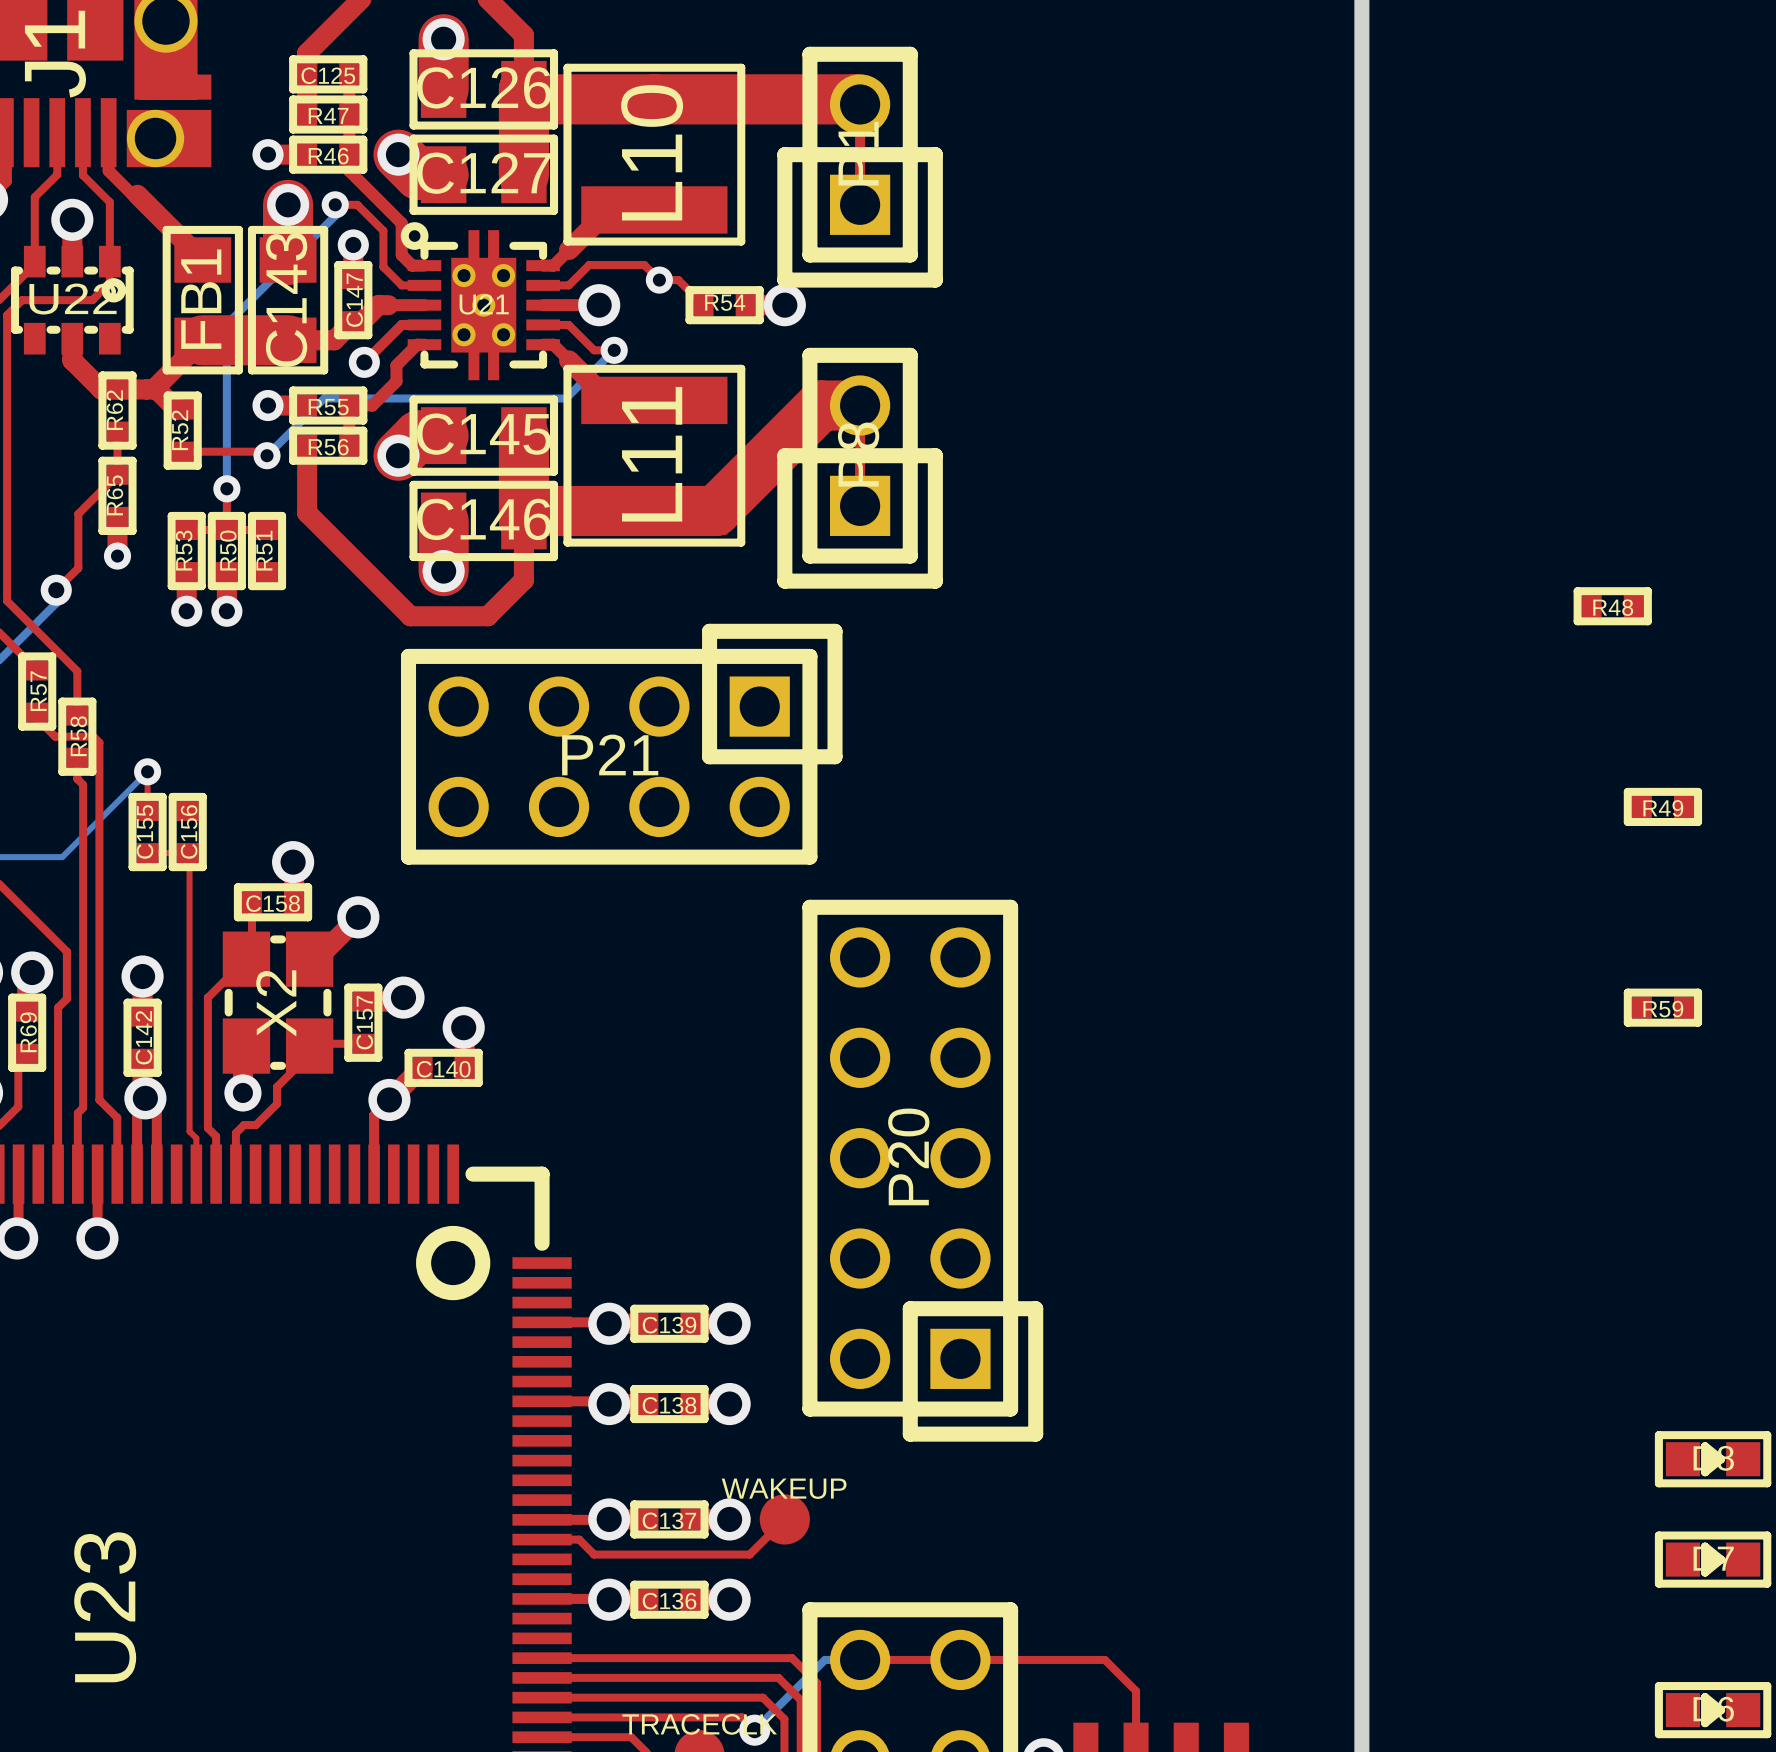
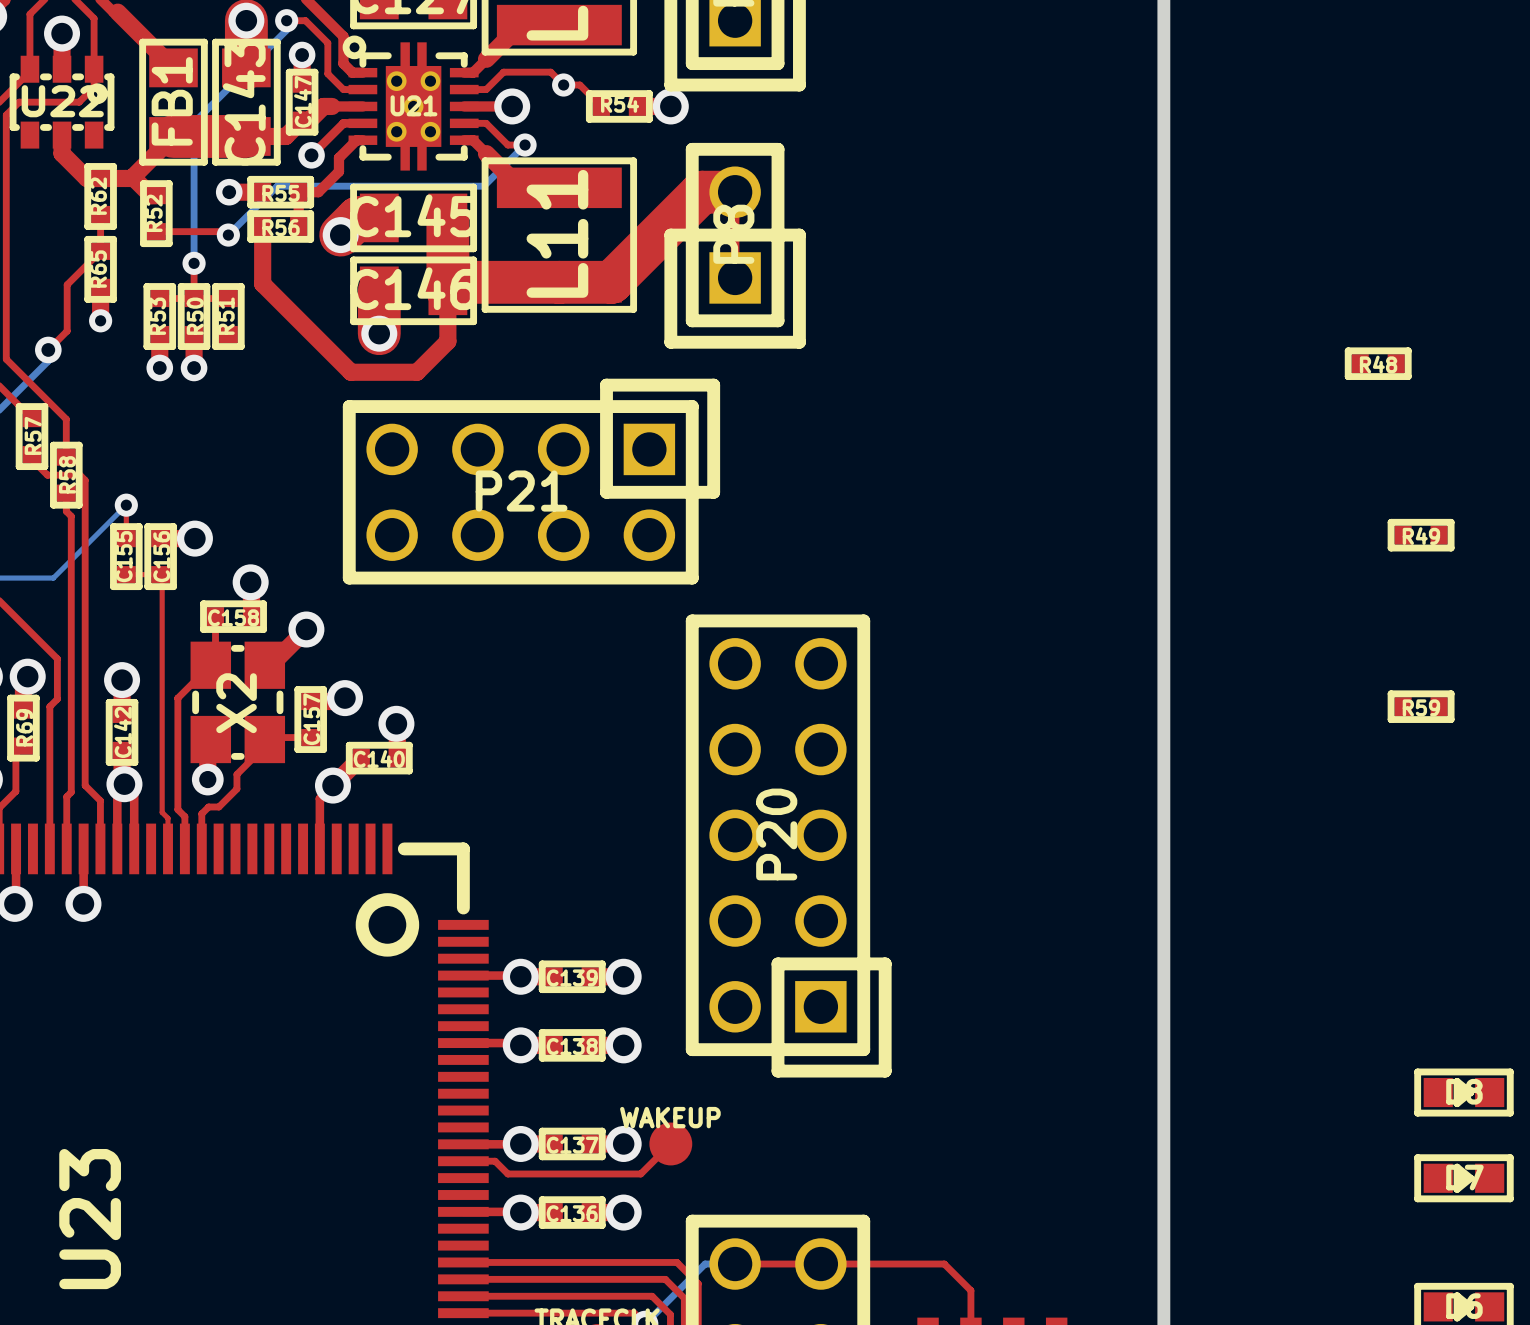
via: none -> (194, 538)

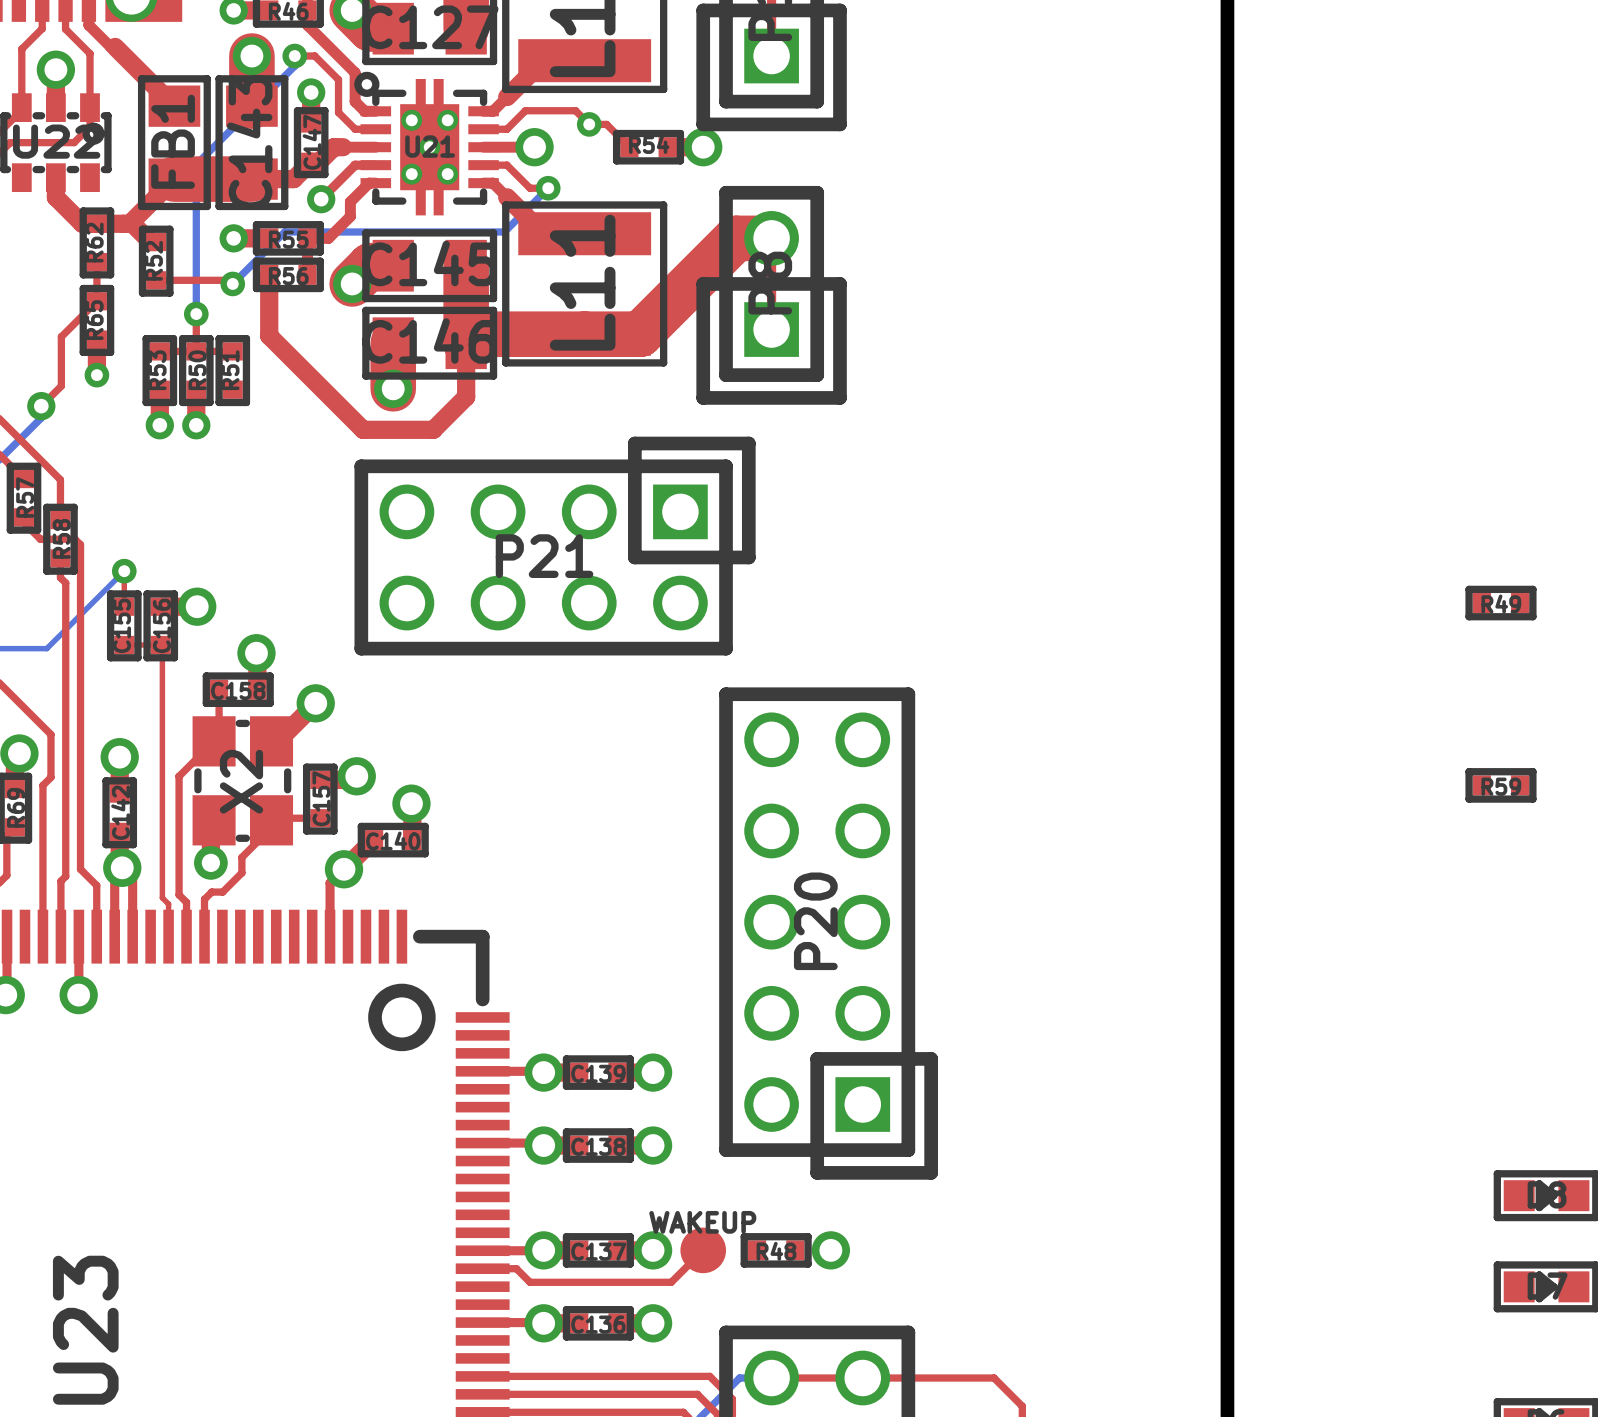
R48 position: (1378, 363) -> (776, 1250)
via: none -> (830, 1250)

